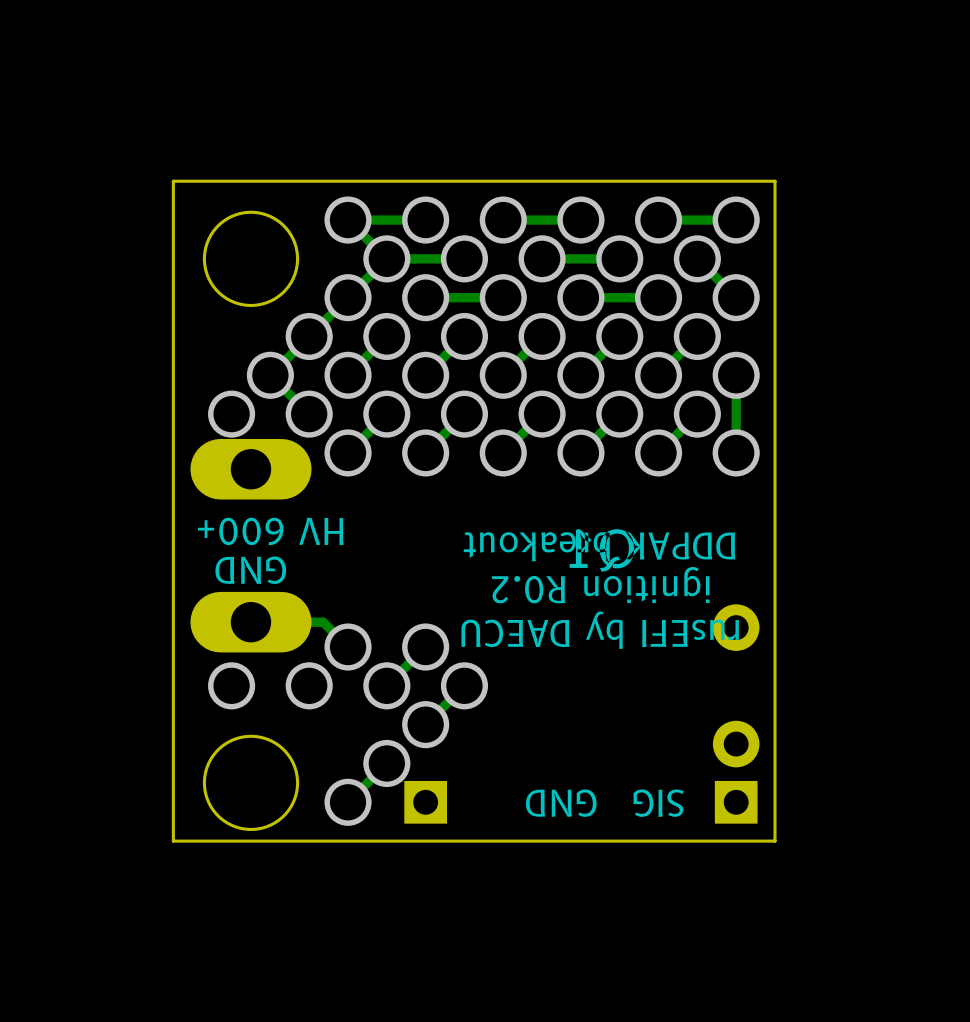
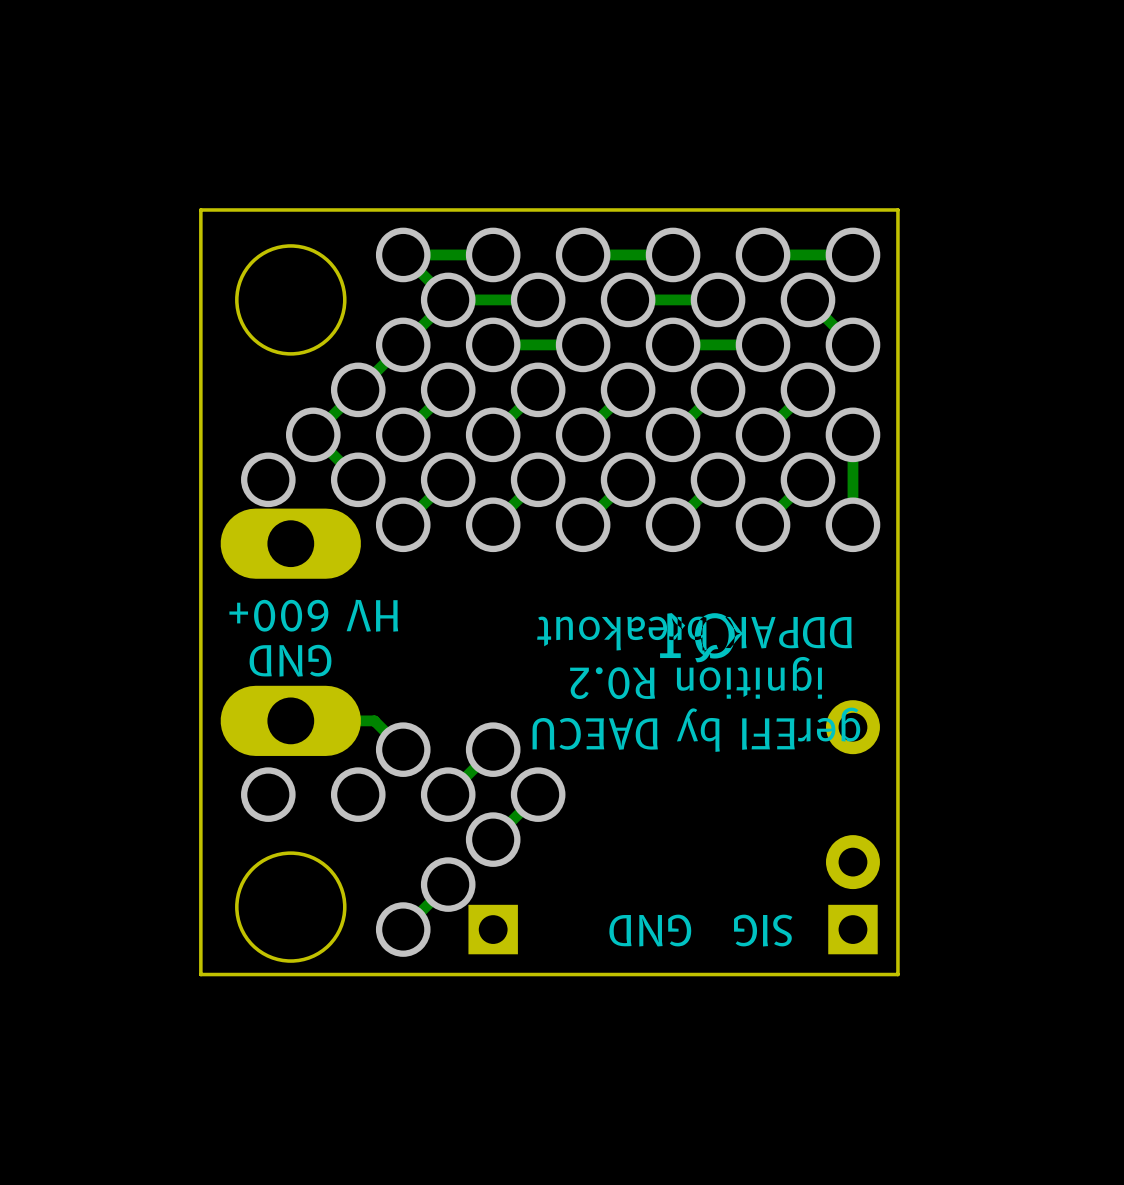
text: rusEFI by DAECU (600, 630) -> gerEFI by DAECU (696, 729)

